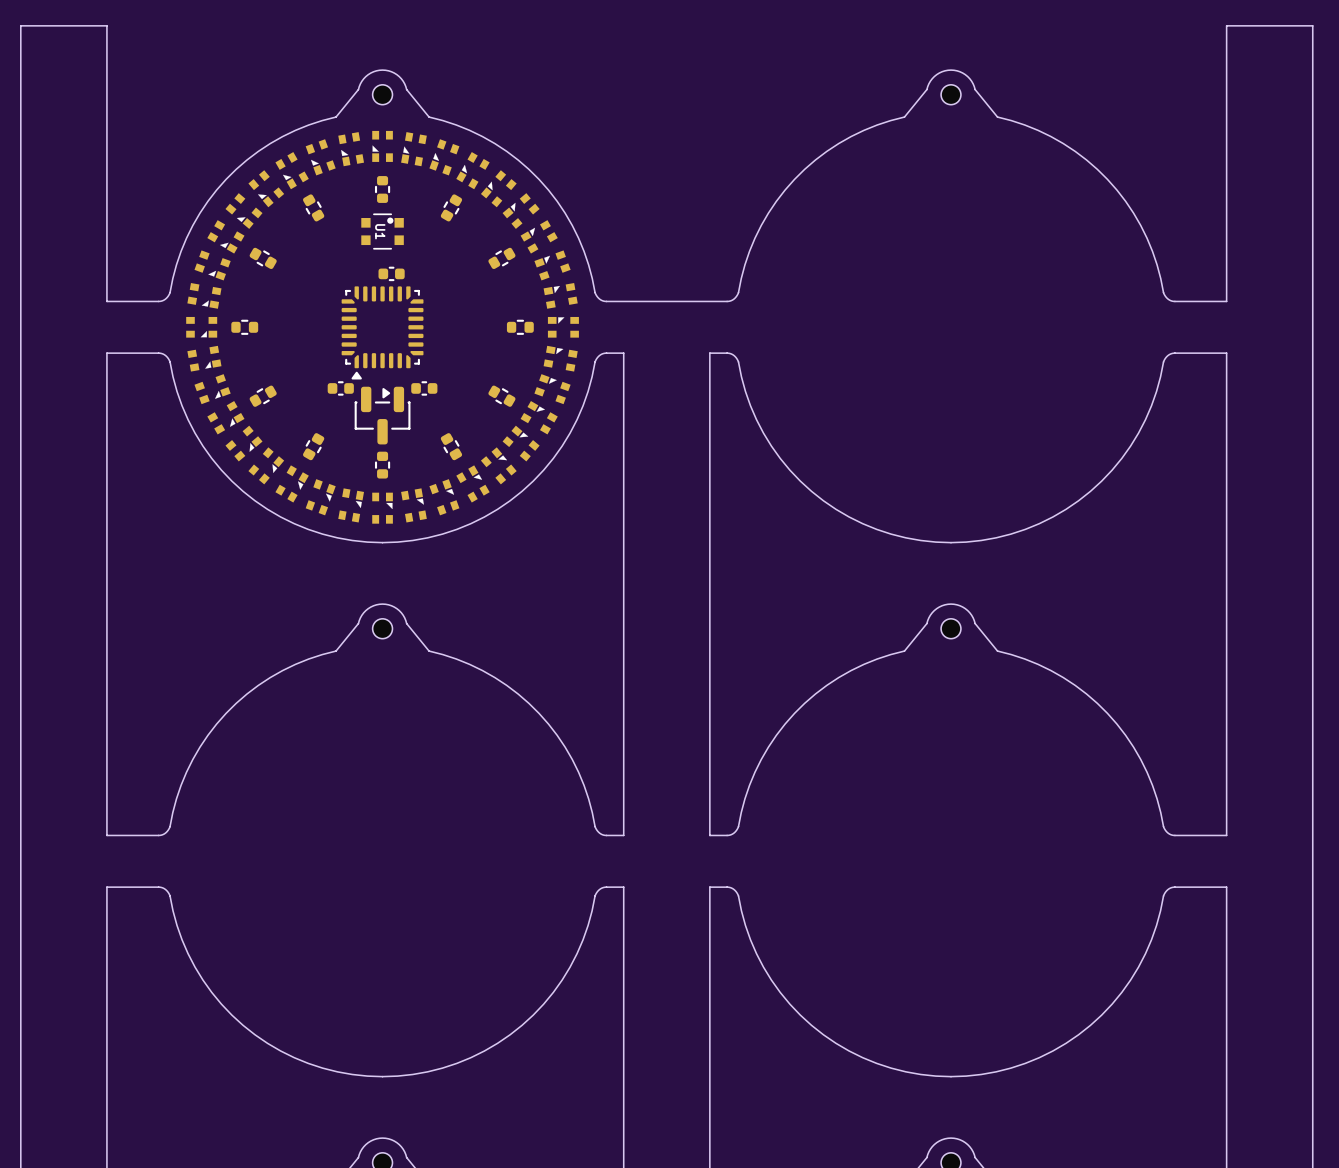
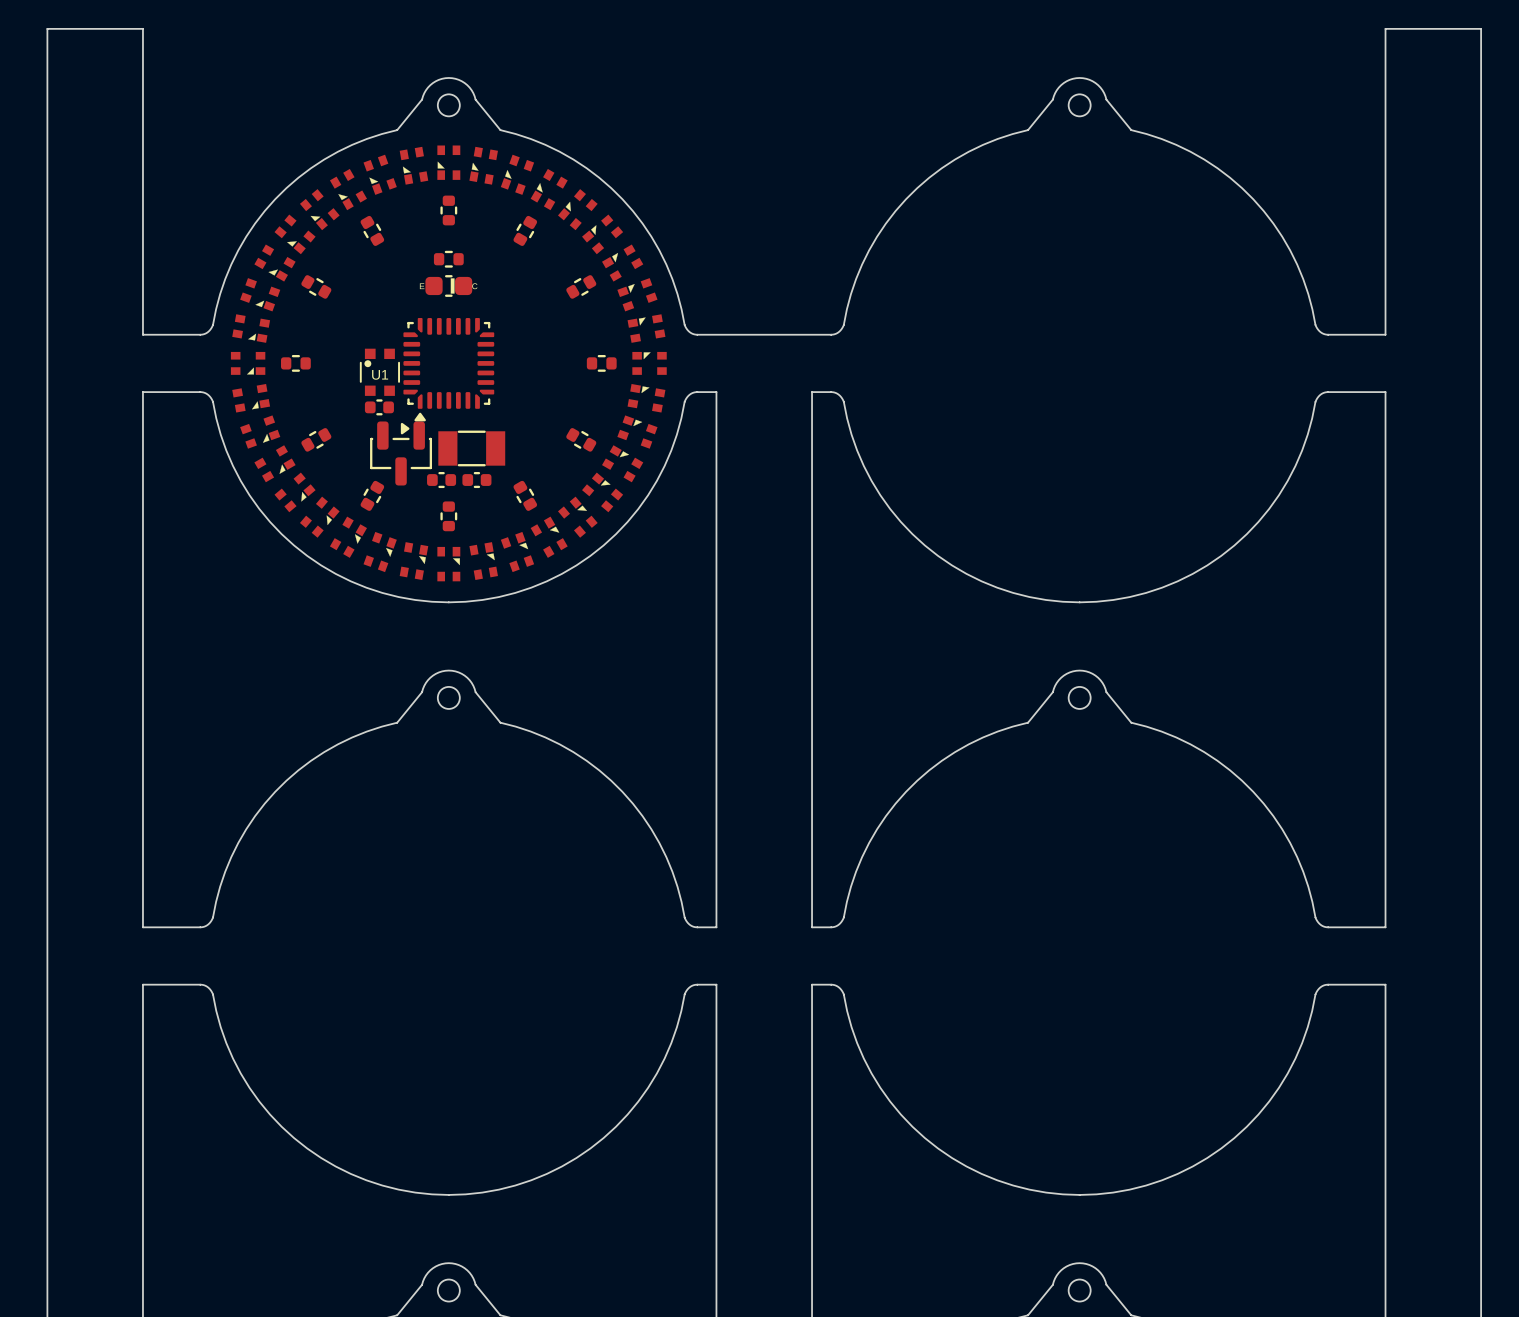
U1 rotation: 0° (382, 231) -> 90° counterclockwise (379, 372)
U1 position: (382, 231) -> (379, 372)
part: none -> (448, 259)
part: none -> (448, 285)
part: (391, 273) -> none
part: none -> (379, 407)
part: (340, 388) -> none
part: (424, 388) -> none
part: none -> (471, 448)
part position: (382, 415) -> (401, 453)
part: none -> (441, 480)
part: none -> (476, 480)

